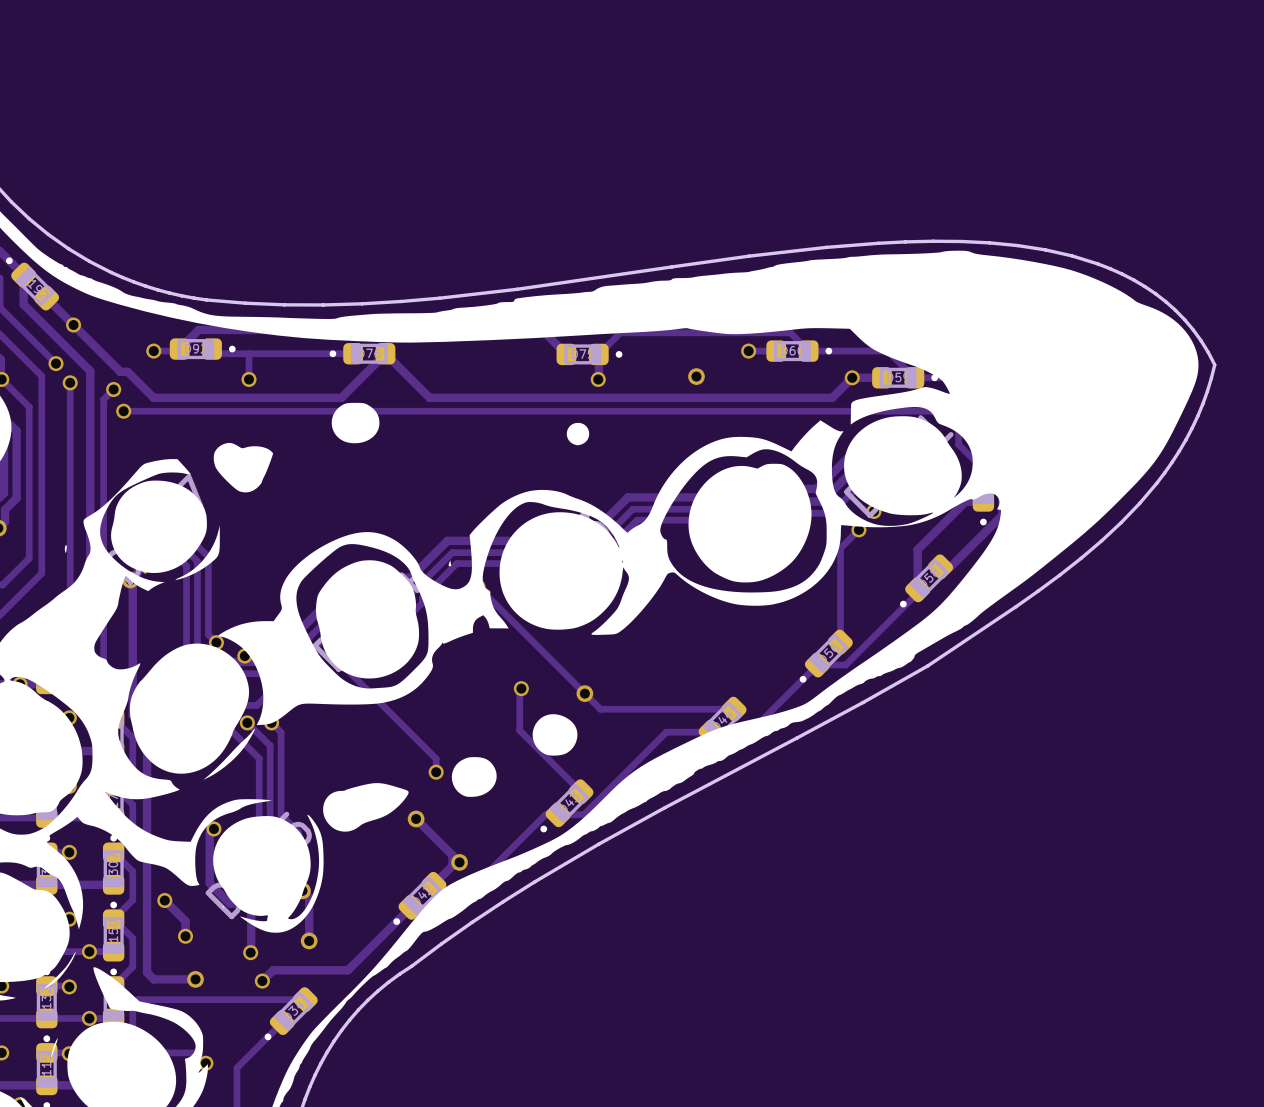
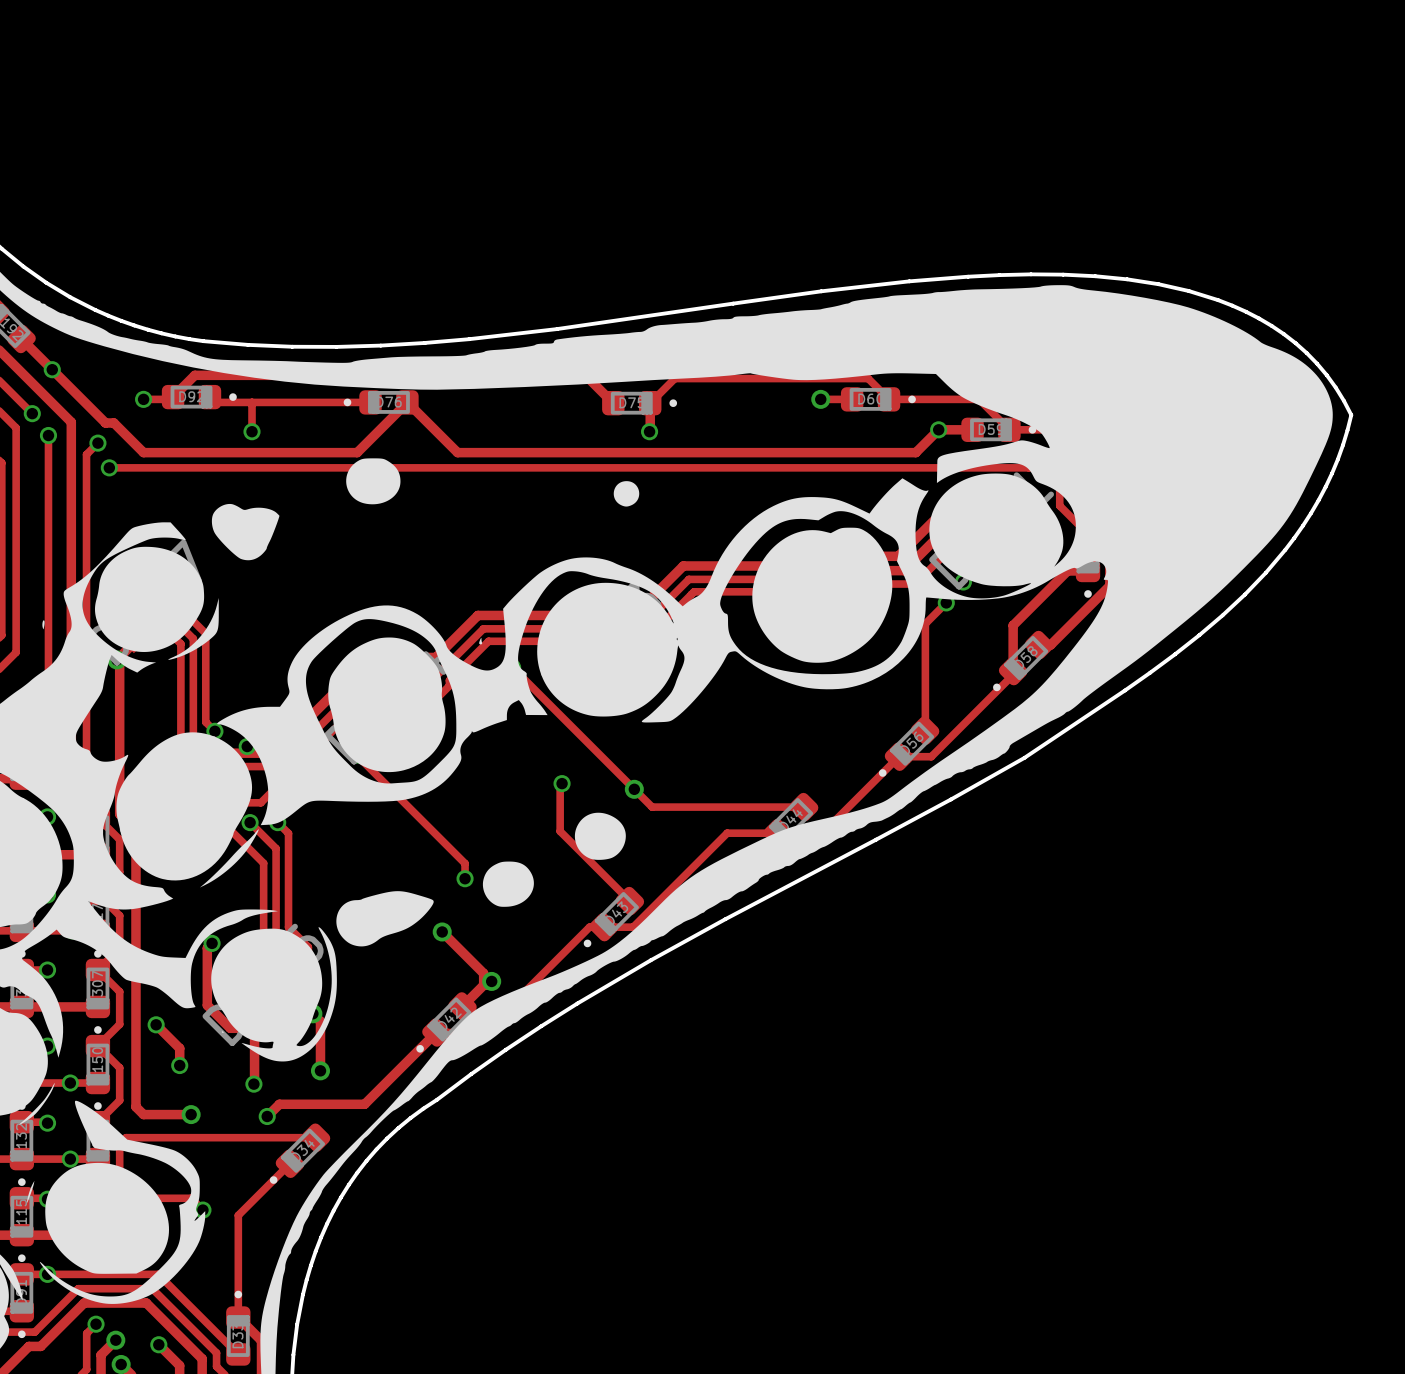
via: (748, 351) -> none
via position: (696, 376) -> (820, 399)

